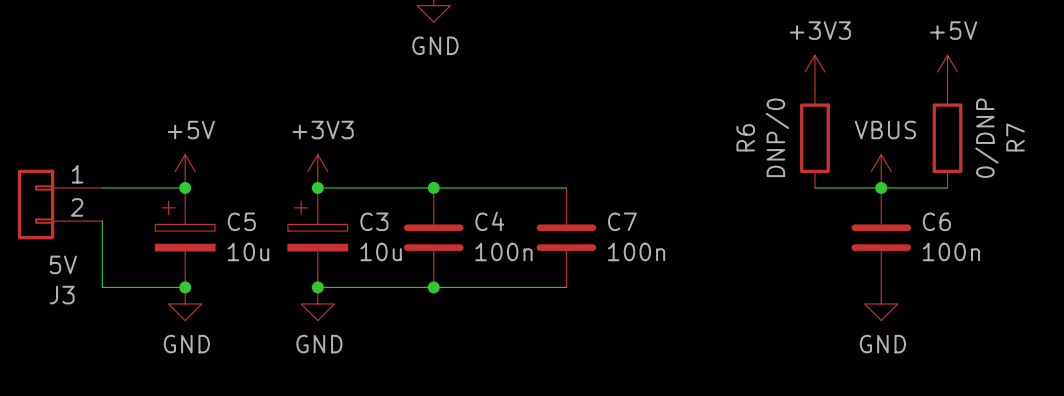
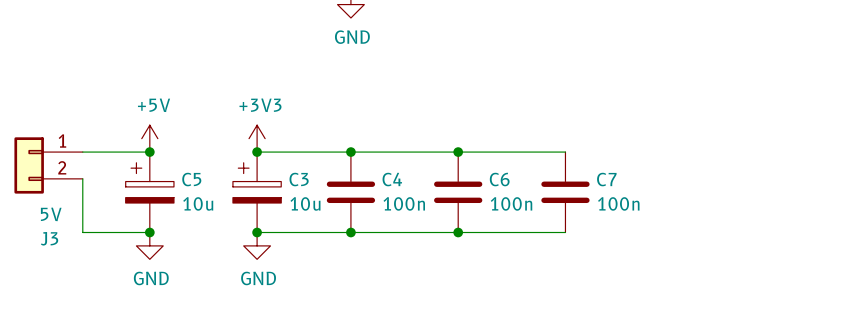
power symbol: +3V3 (814, 71) -> none
power symbol: +5V (947, 71) -> none
R6: DNP/0 (814, 138) -> none
R7: 0/DNP (947, 138) -> none
power symbol: VBUS (881, 171) -> none
junction: none -> (458, 152)
wire: (814, 187) (947, 187) -> (458, 152) (565, 152)
junction: (881, 187) -> none
C7 name: C7 (622, 221) -> C6 (499, 179)
C7: none -> 100n (565, 192)
C6: 100n (881, 237) -> none
wire: none -> (458, 232) (565, 232)
junction: none -> (458, 232)
power symbol: GND (881, 303) -> none

